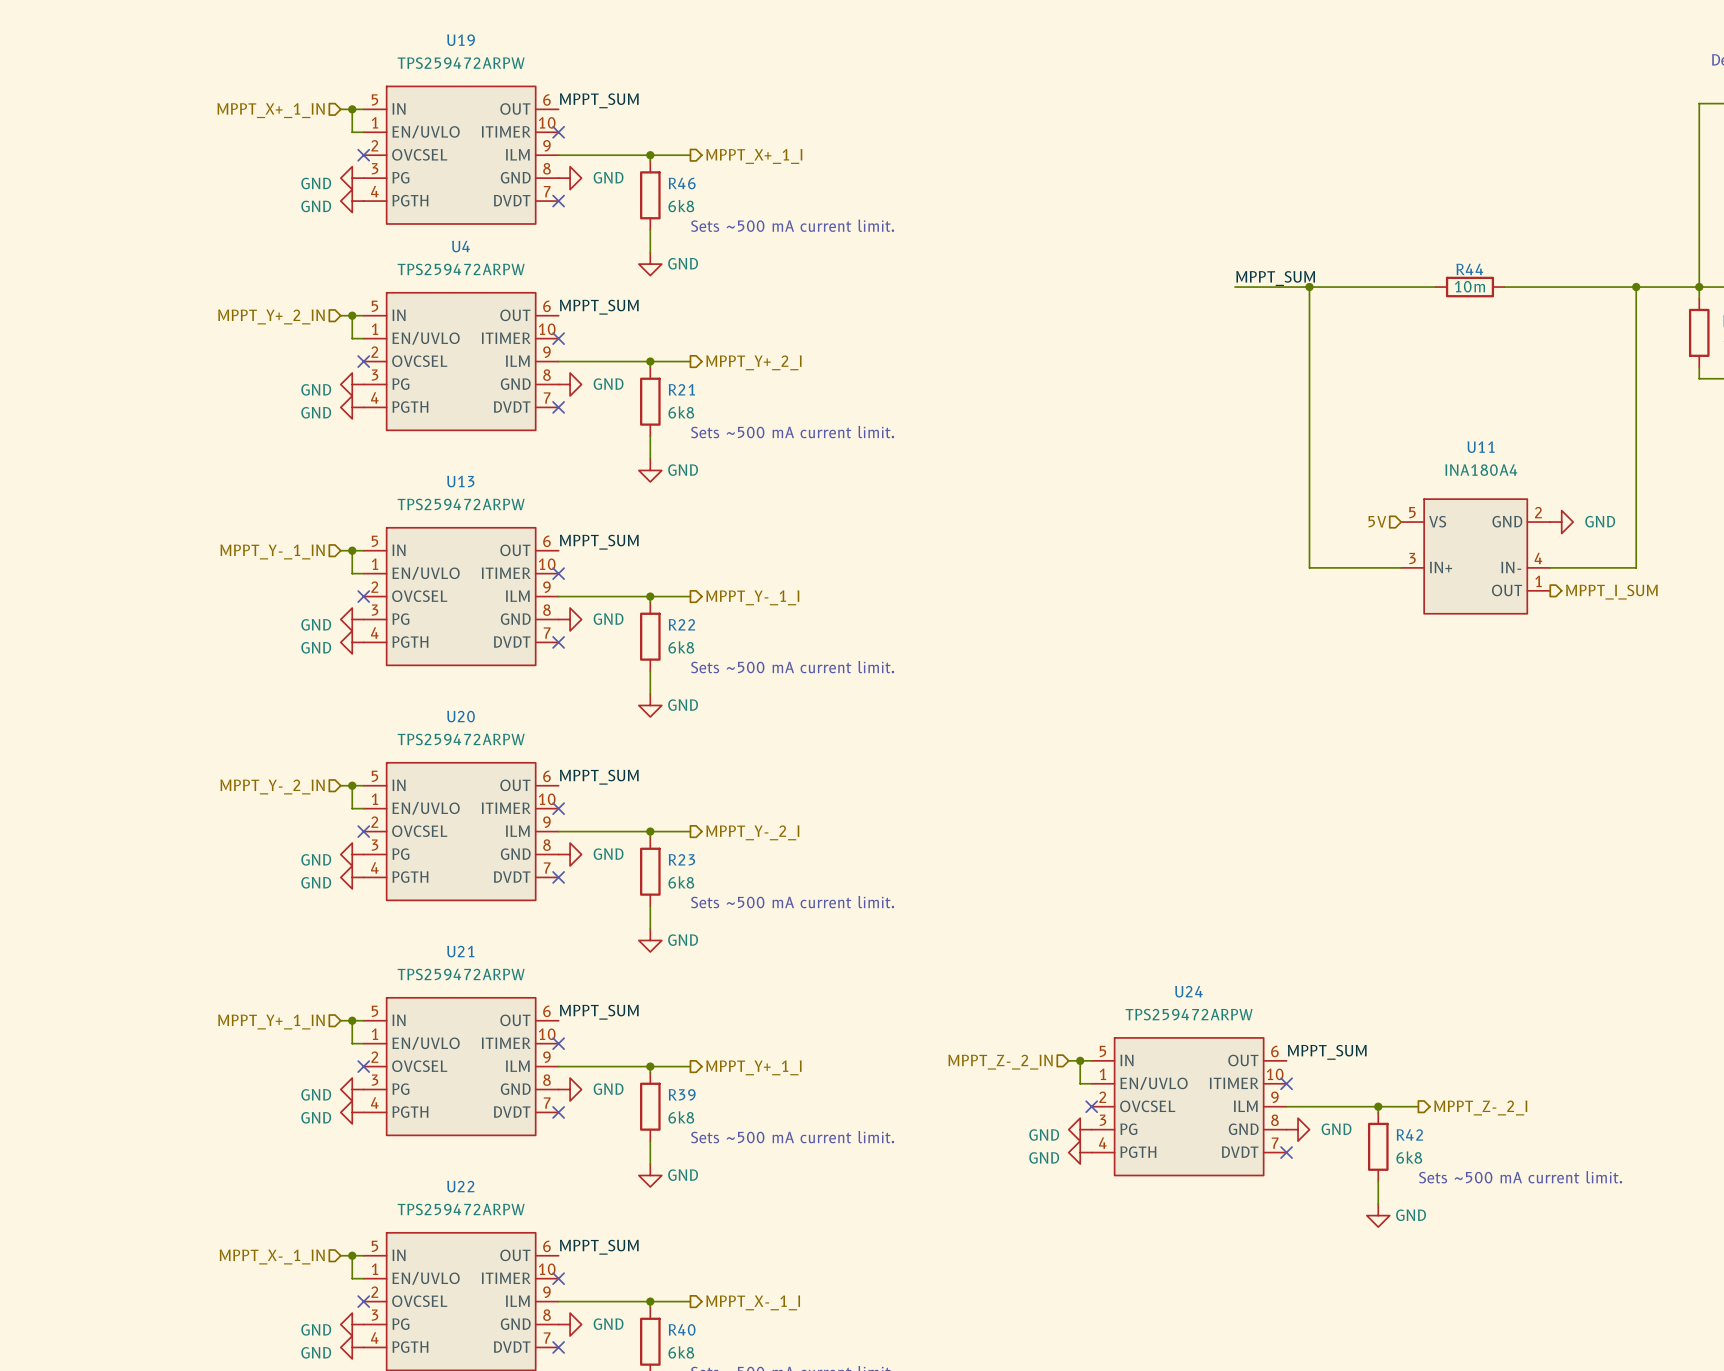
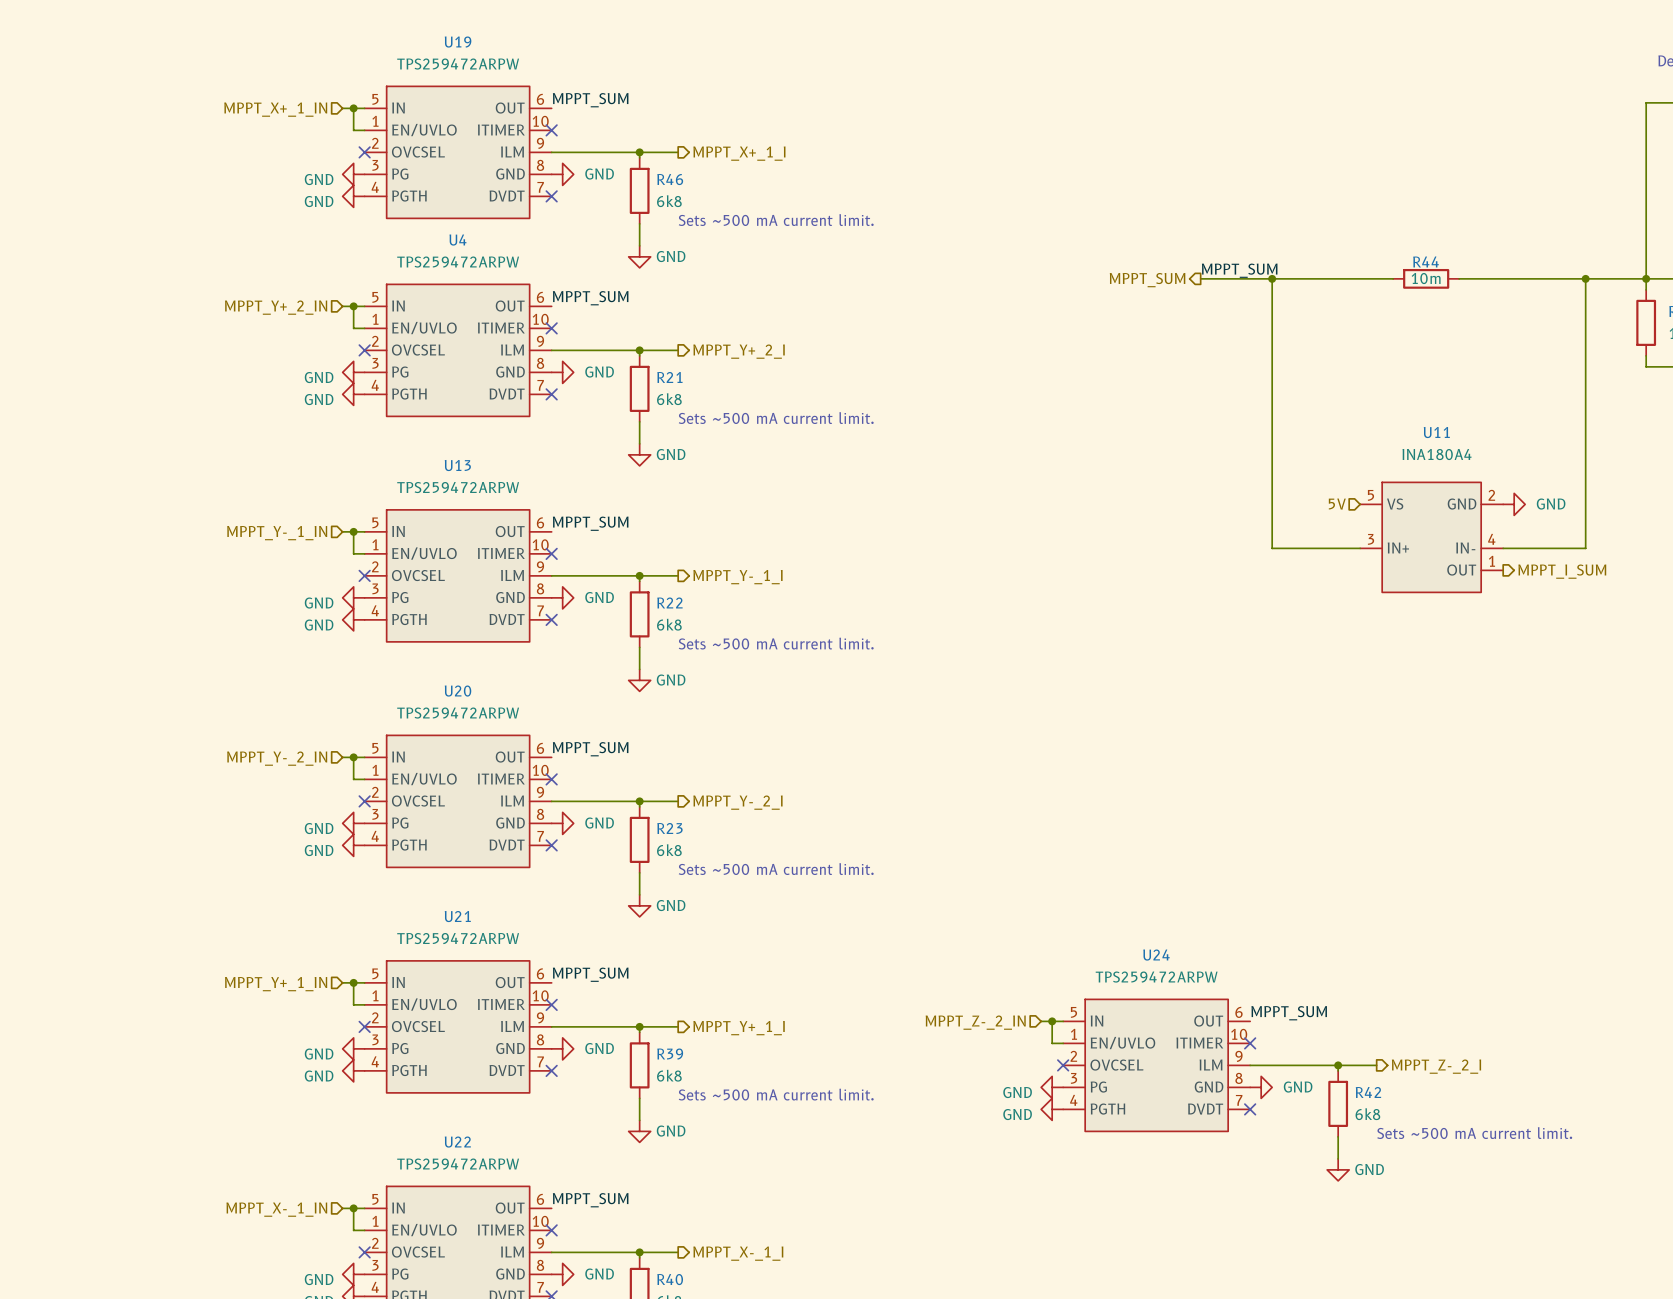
hierarchical label: none -> MPPT_SUM (1147, 280)

